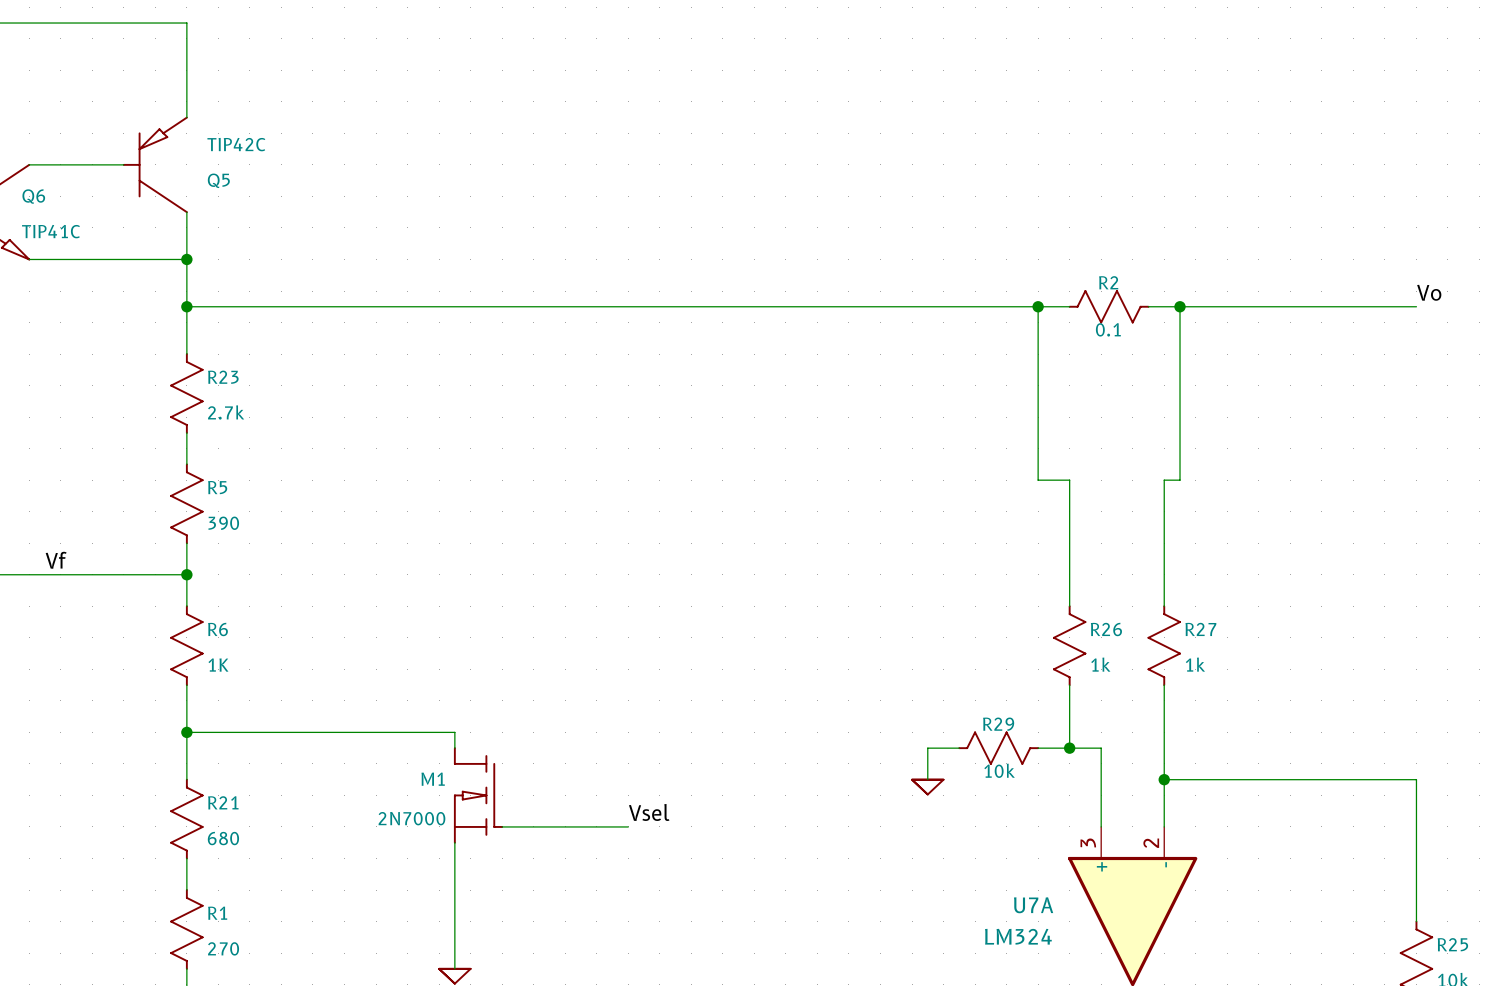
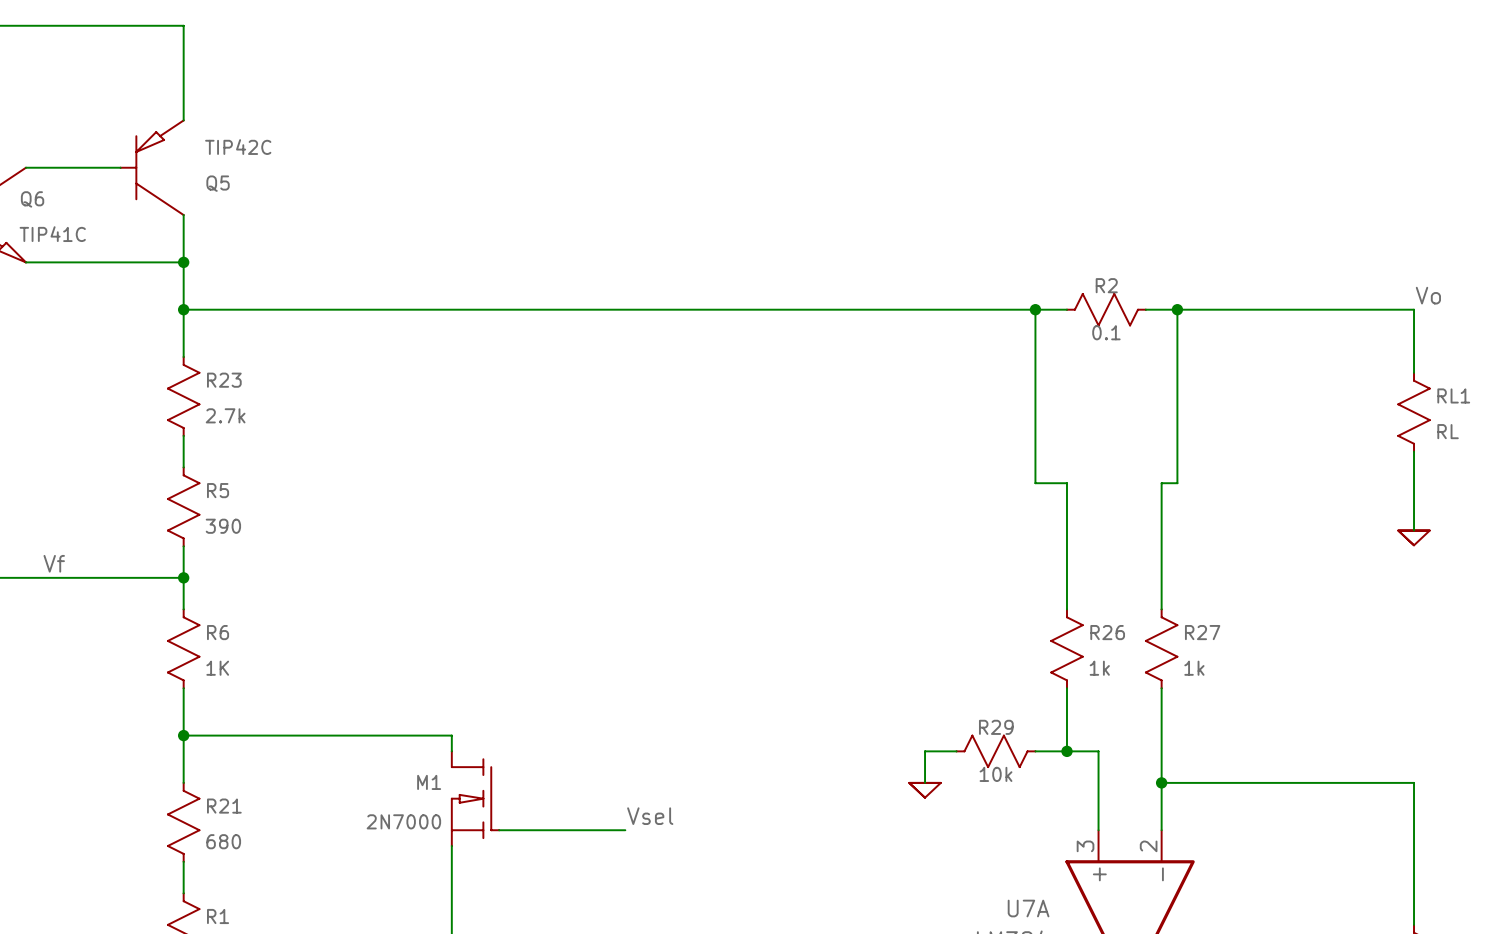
wire: none -> (1414, 309) (1414, 372)
RL1: none -> RL (1414, 412)
wire: none -> (1414, 451) (1414, 530)
power symbol: none -> (1414, 537)

